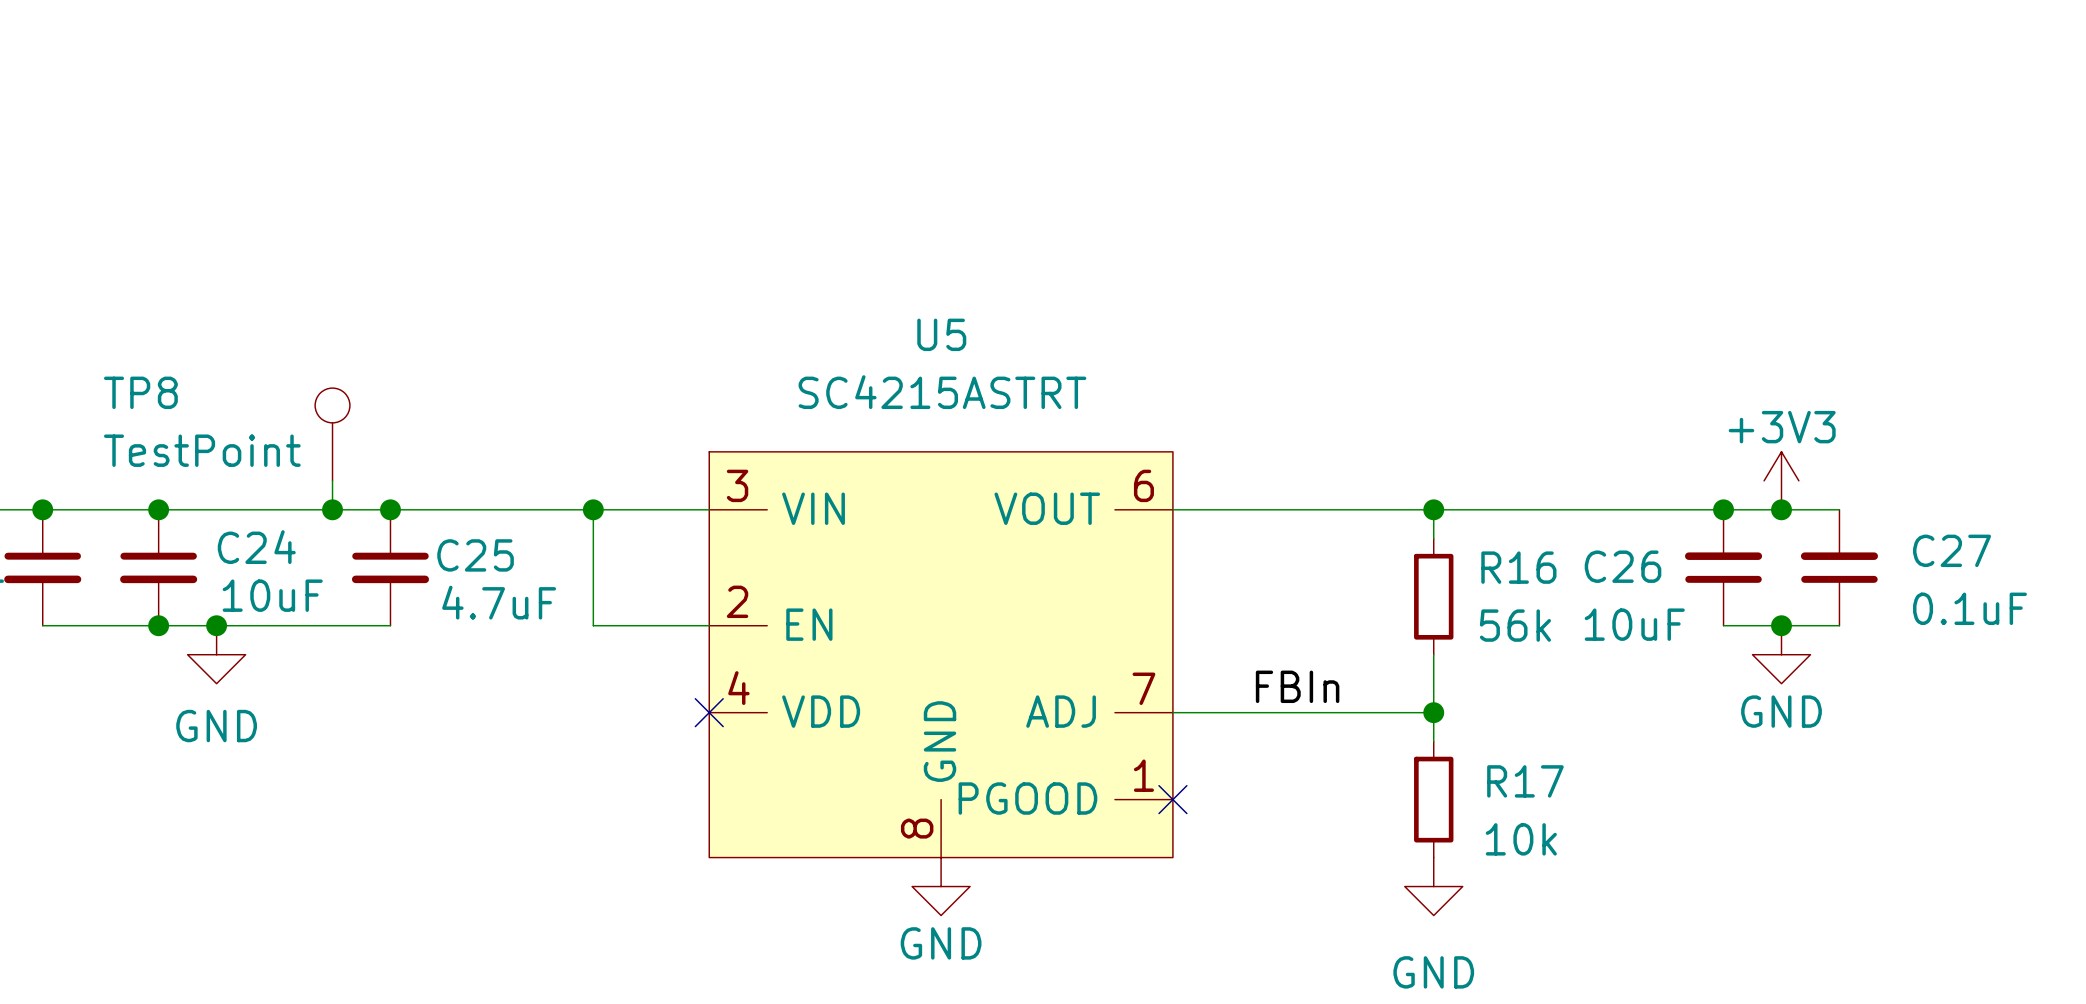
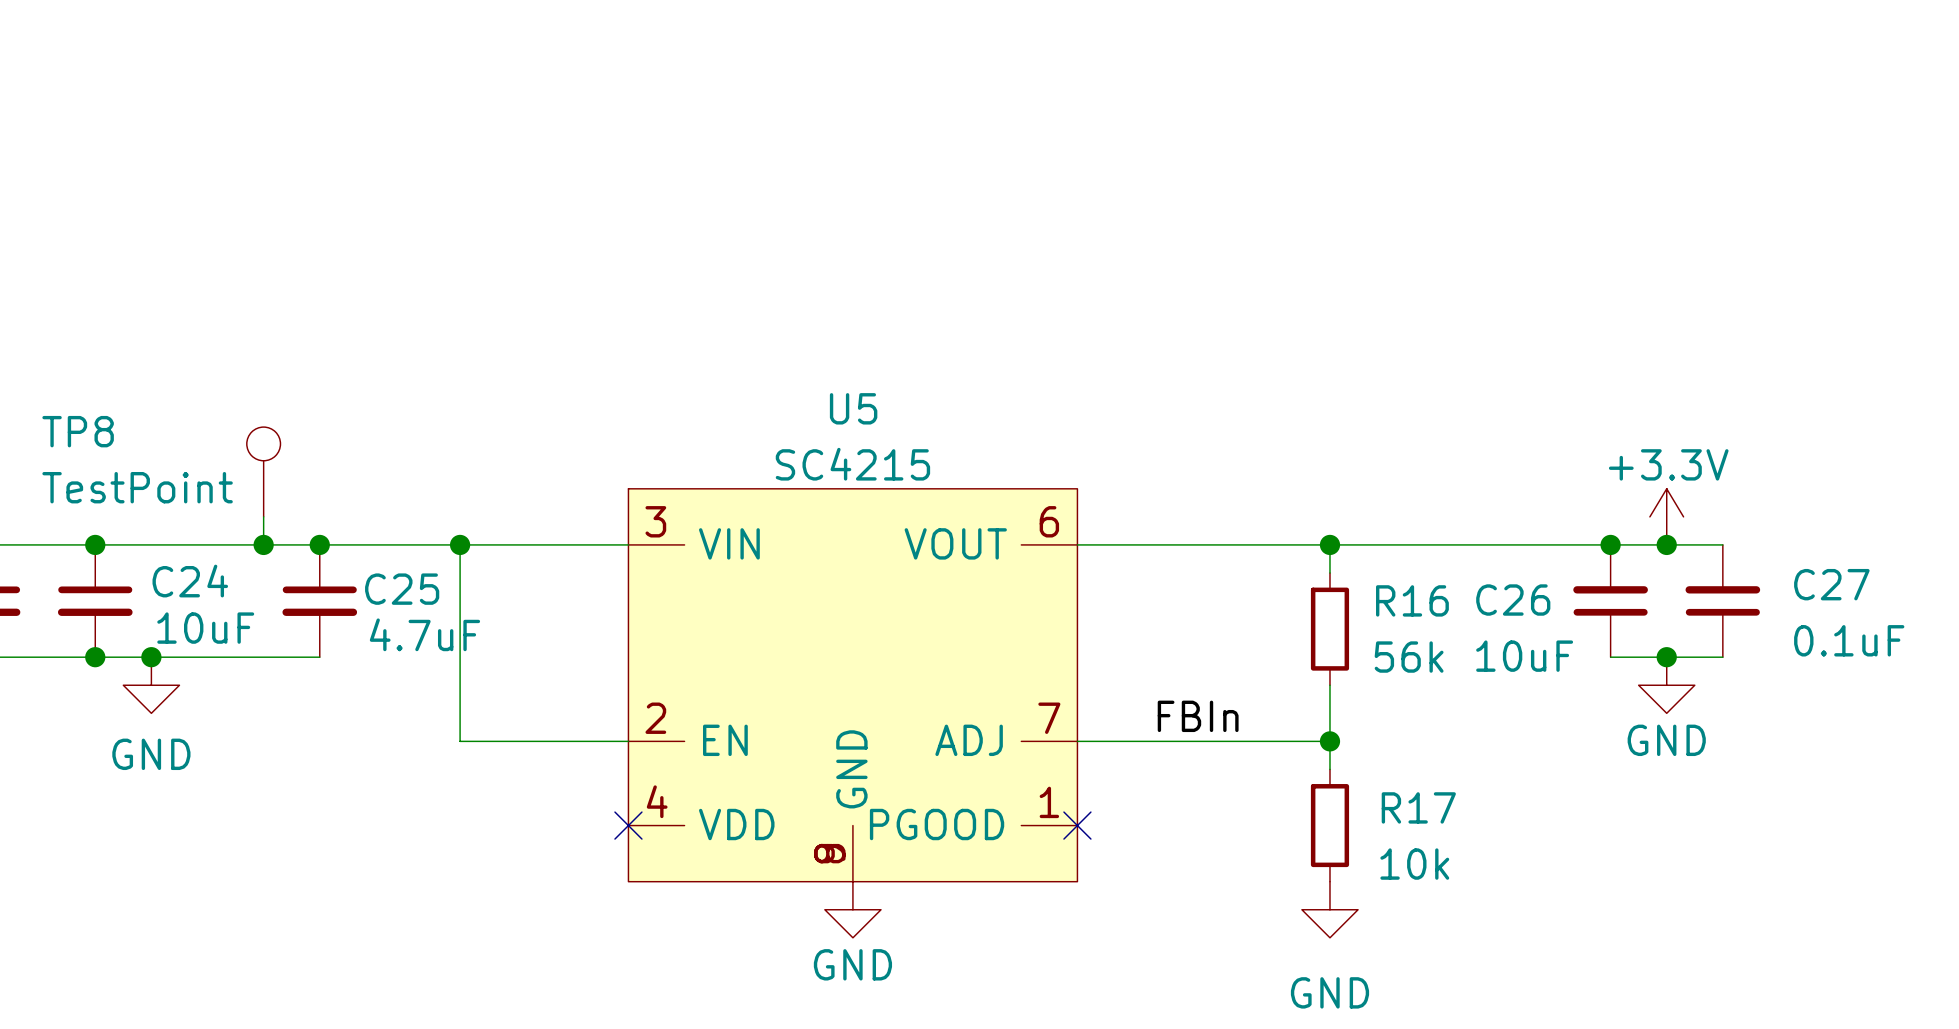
U5 value: SC4215ASTRT (942, 392) -> SC4215 (852, 464)
U5 symbol: [709, 451, 1173, 858] -> [628, 488, 1078, 882]
power symbol: +3V3 (1781, 480) -> +3.3V (1666, 516)
wire: none -> (460, 544) (460, 741) (628, 741)
wire: (593, 509) (593, 625) (709, 625) -> none
junction position: (593, 509) -> (460, 544)
no-connect mark position: (709, 712) -> (628, 825)

